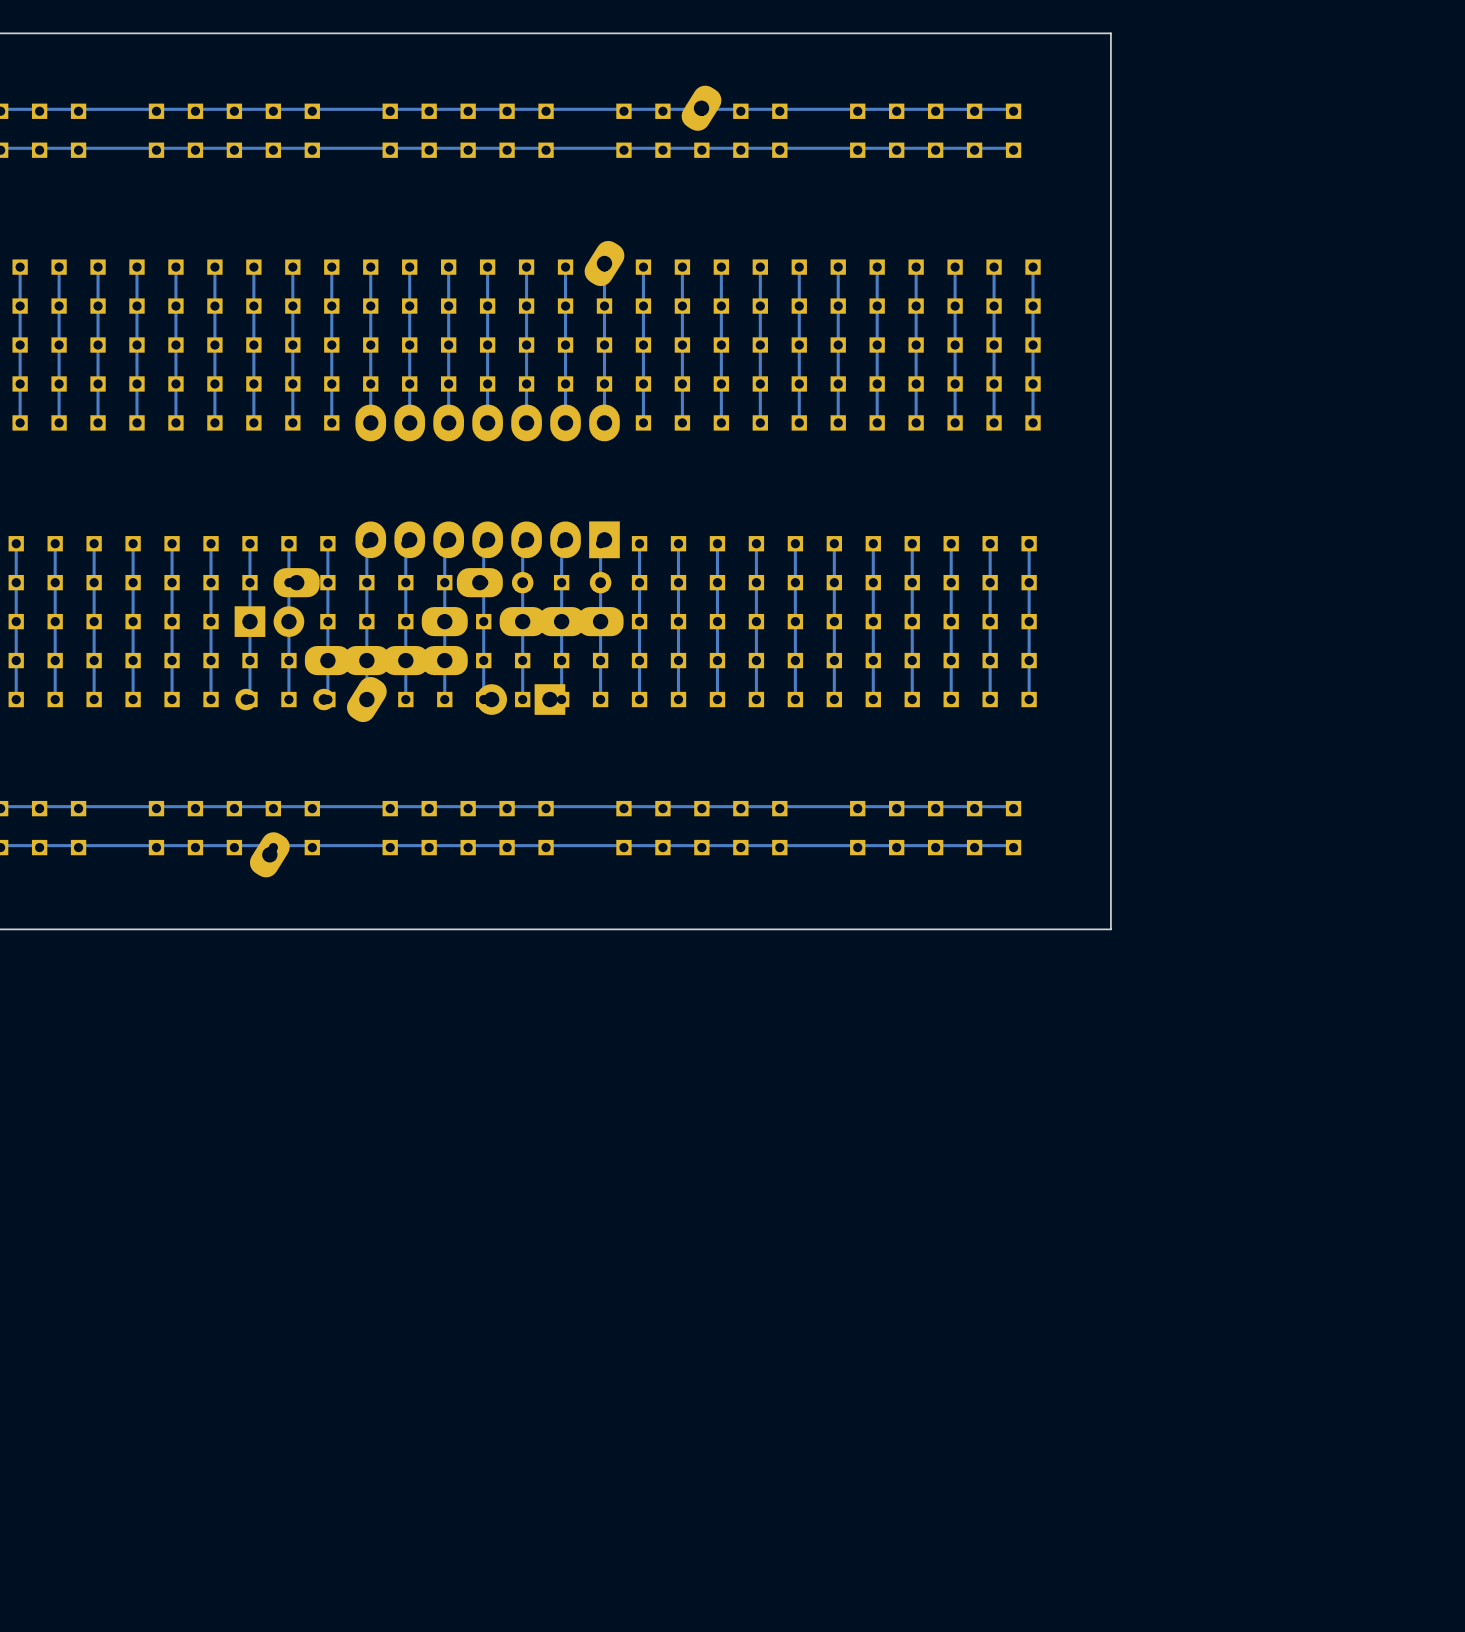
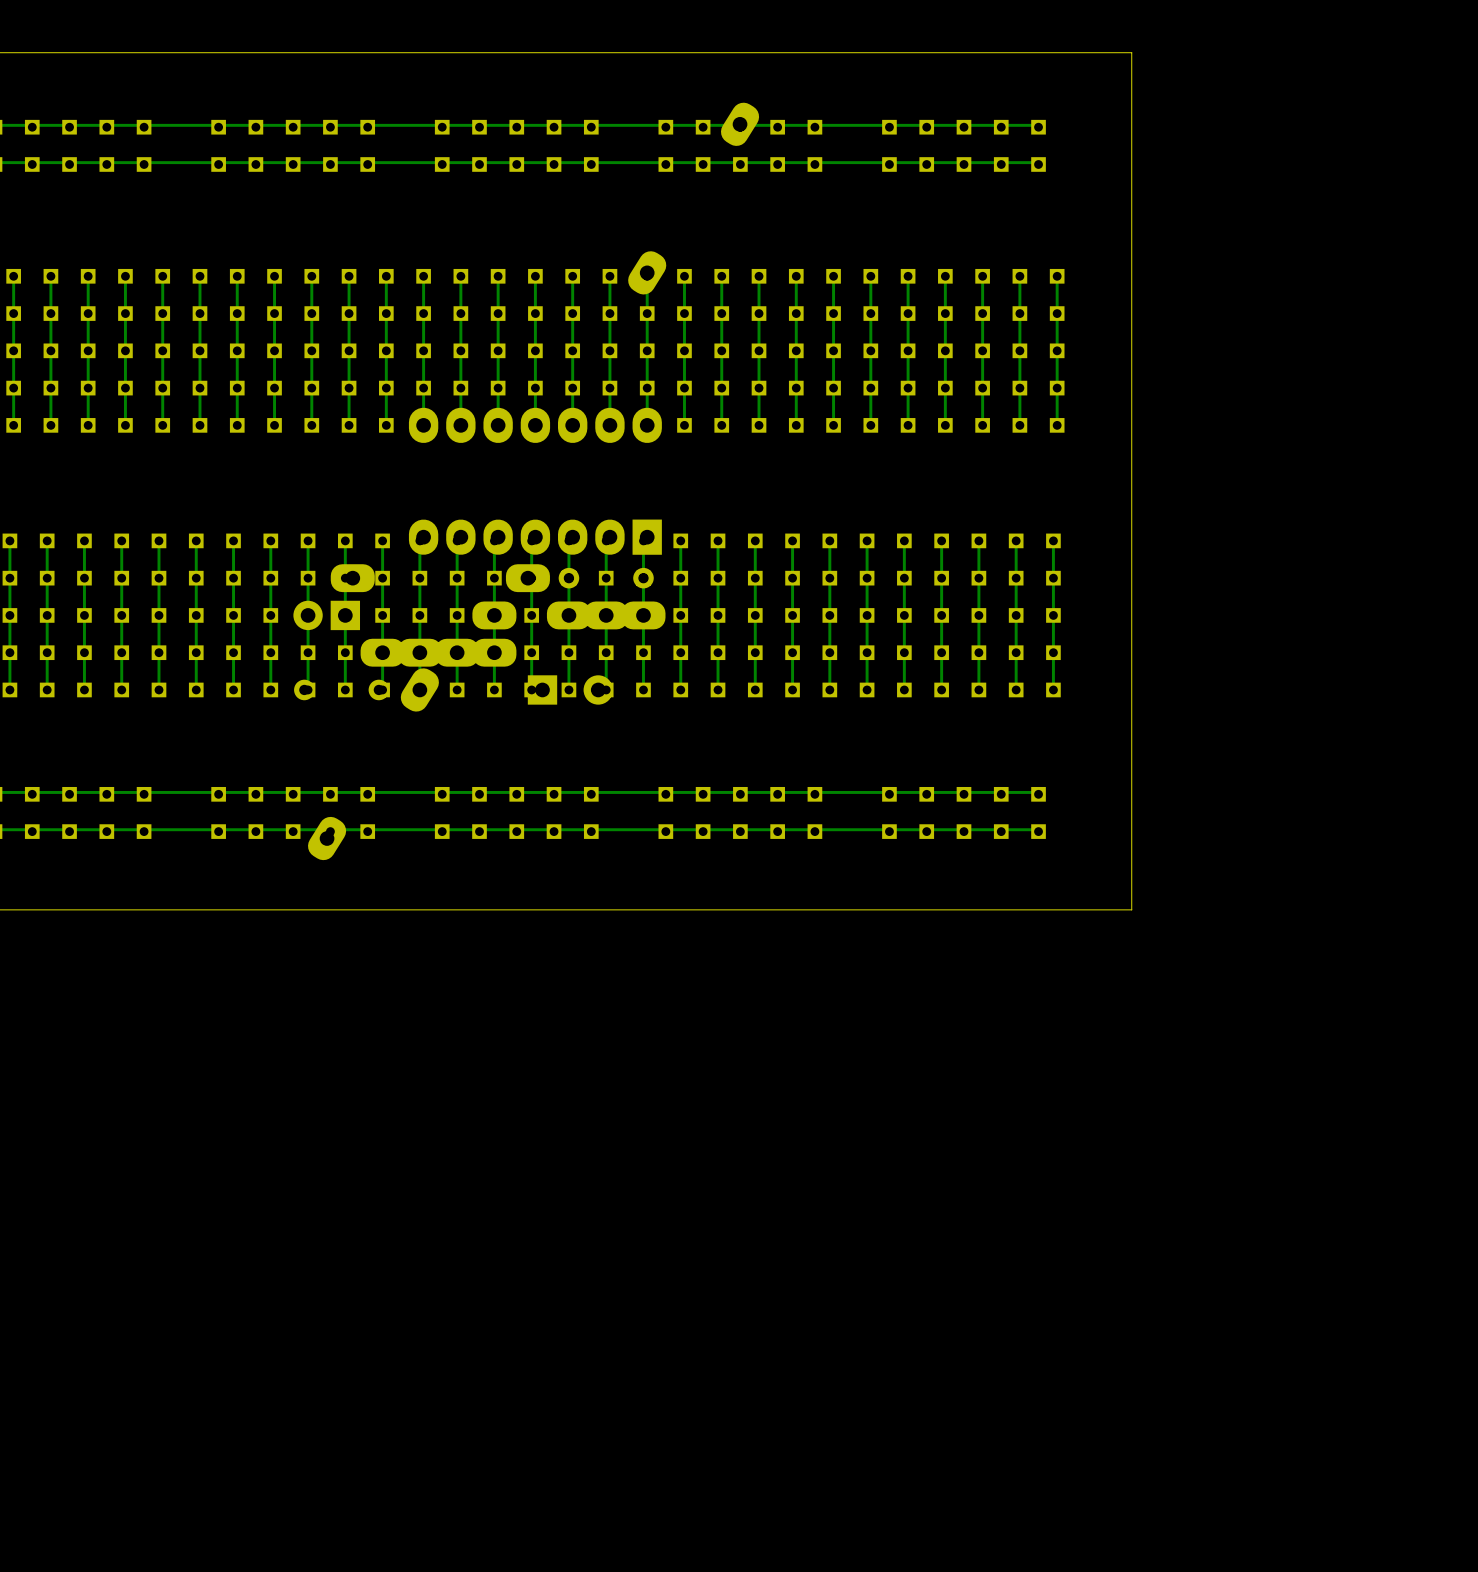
part rotation: 0° (269, 621) -> 180° (326, 615)
part rotation: 0° (520, 699) -> 180° (570, 689)

